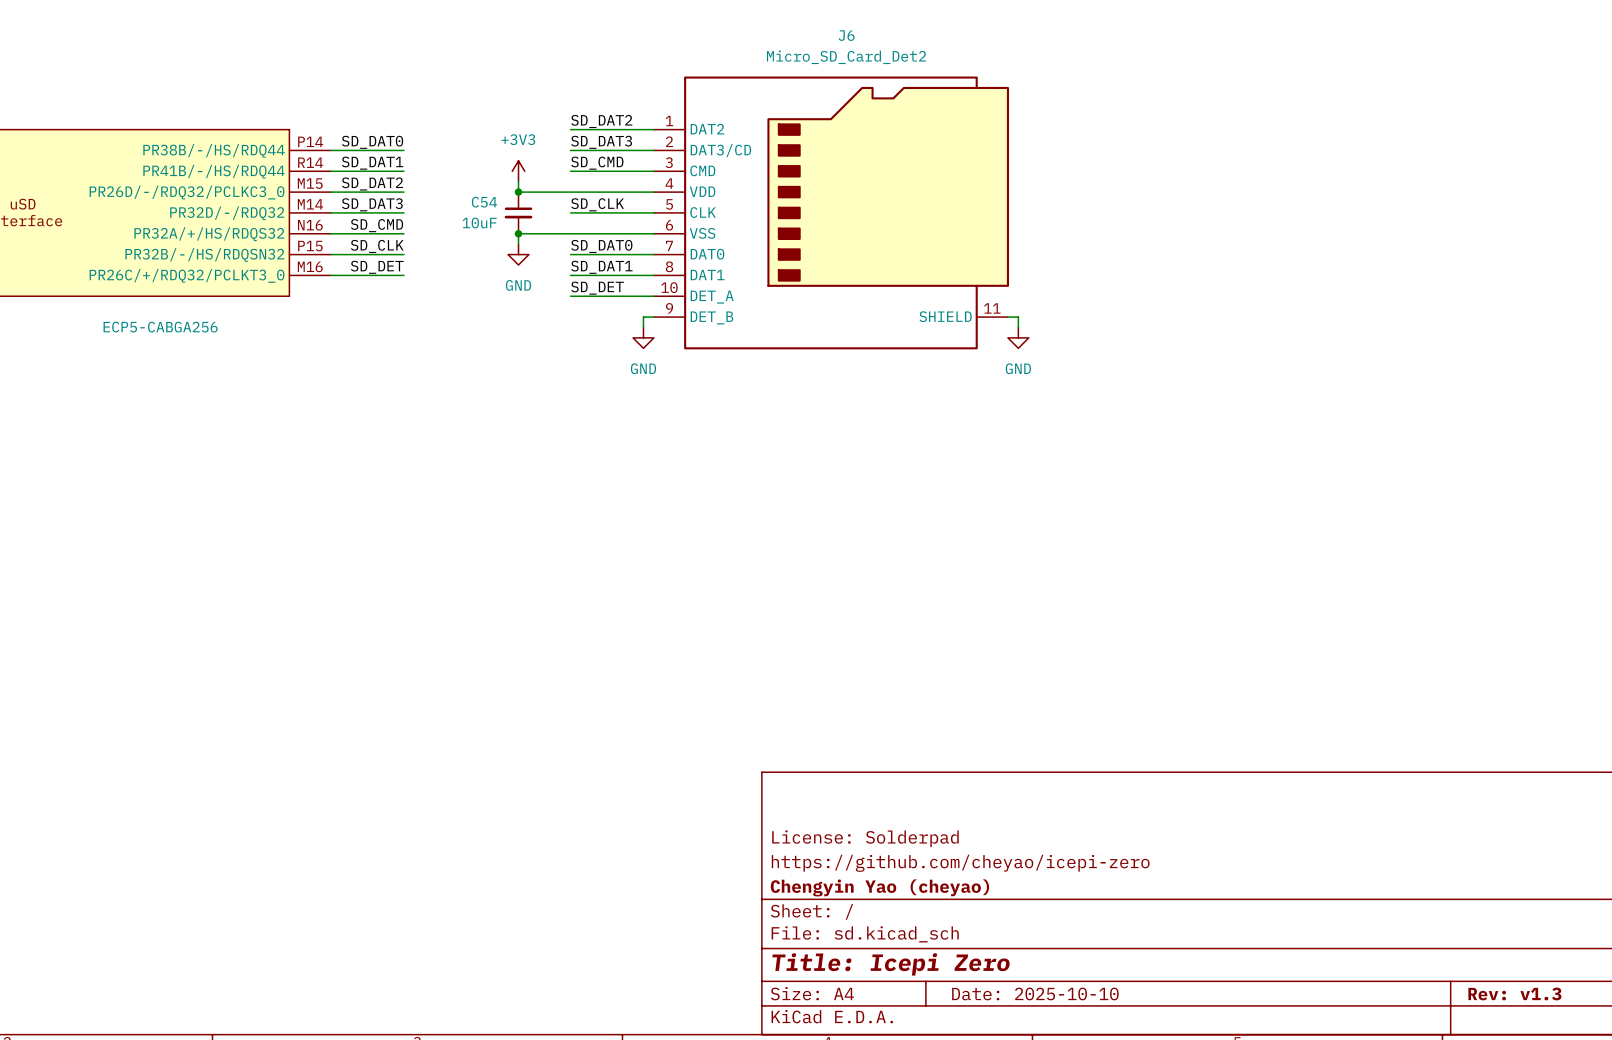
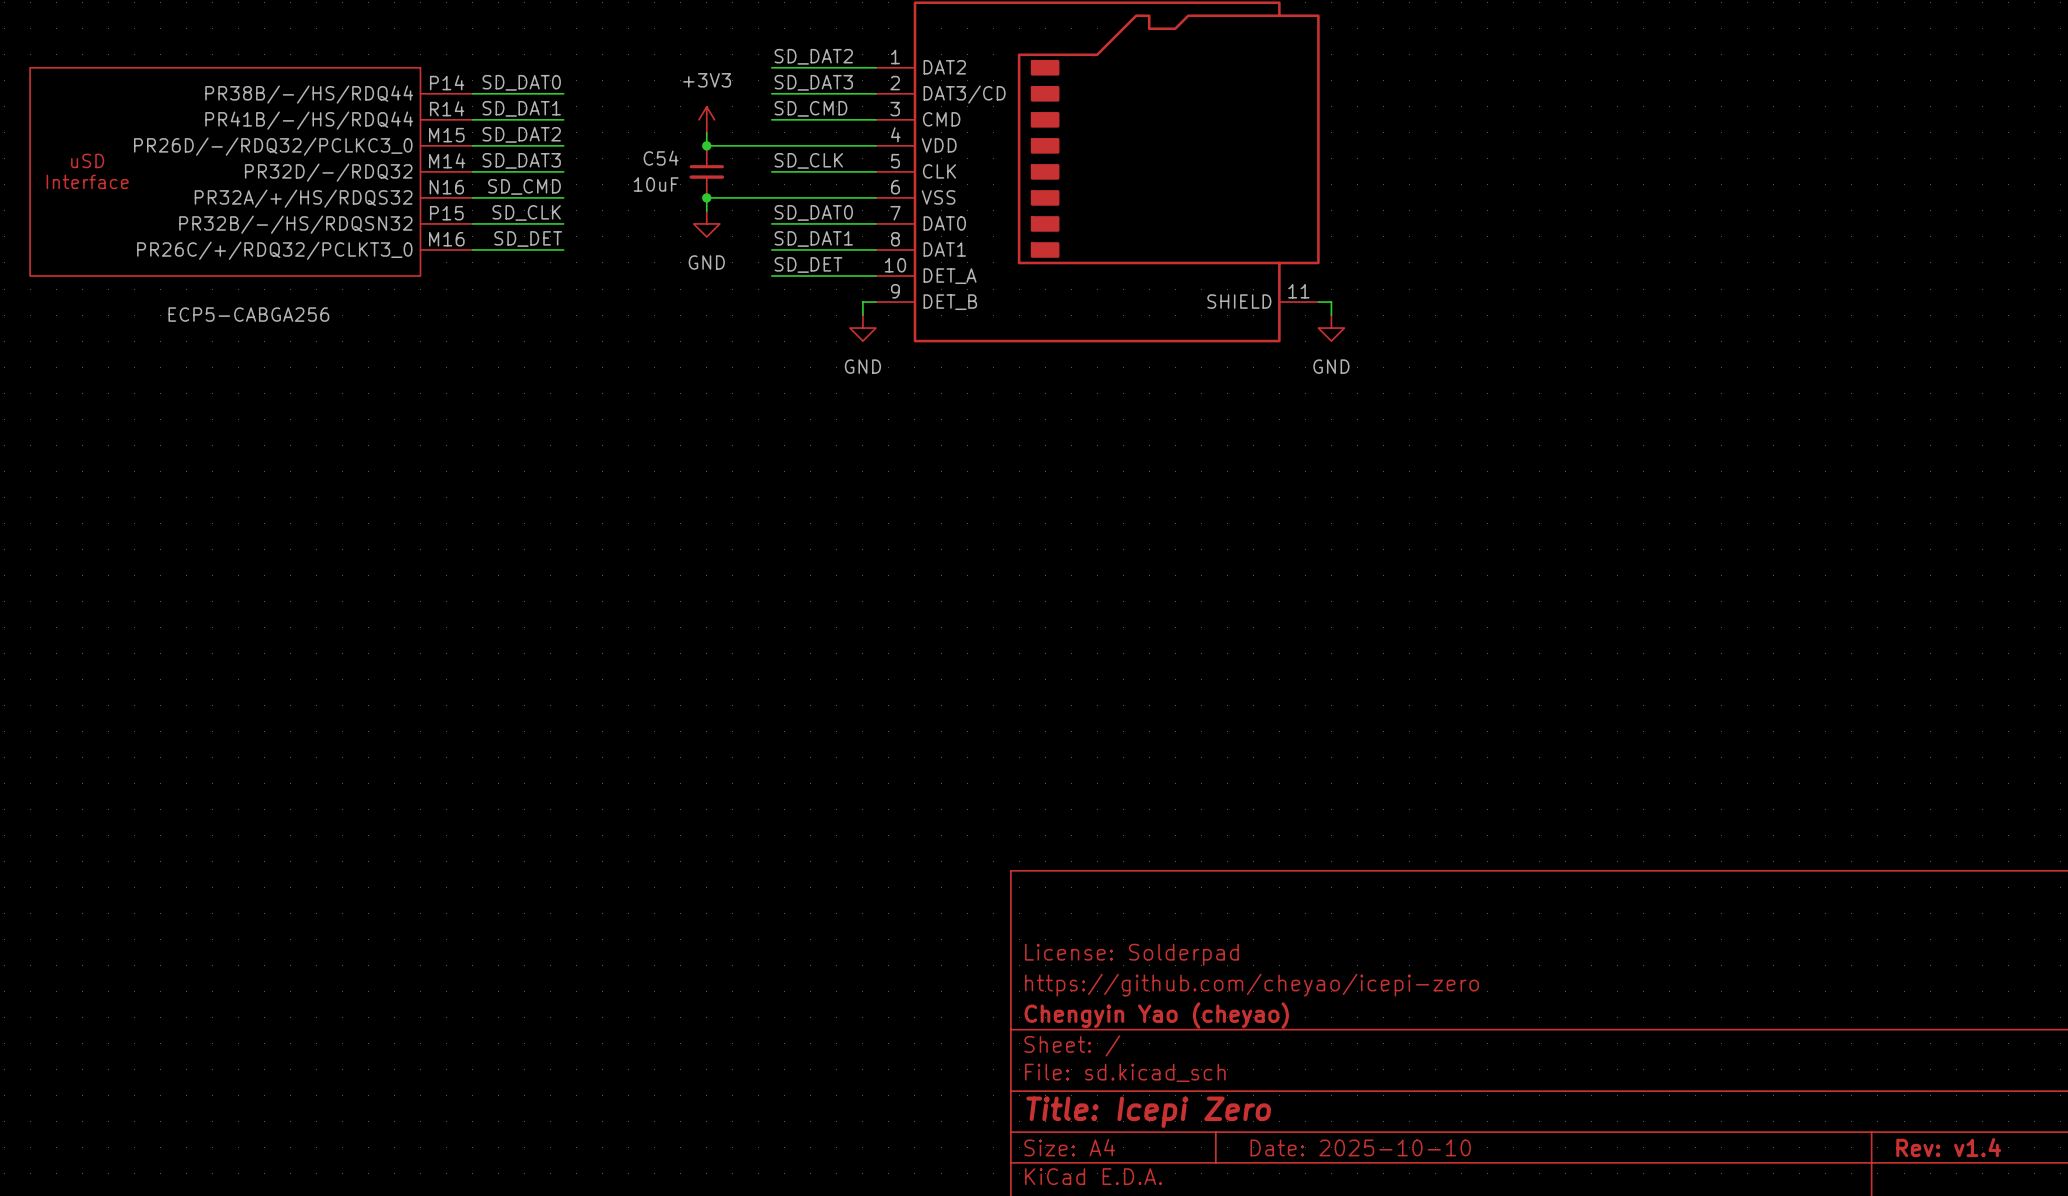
title block: Rev: v1.3 (1514, 993) -> Rev: v1.4 (1948, 1147)

